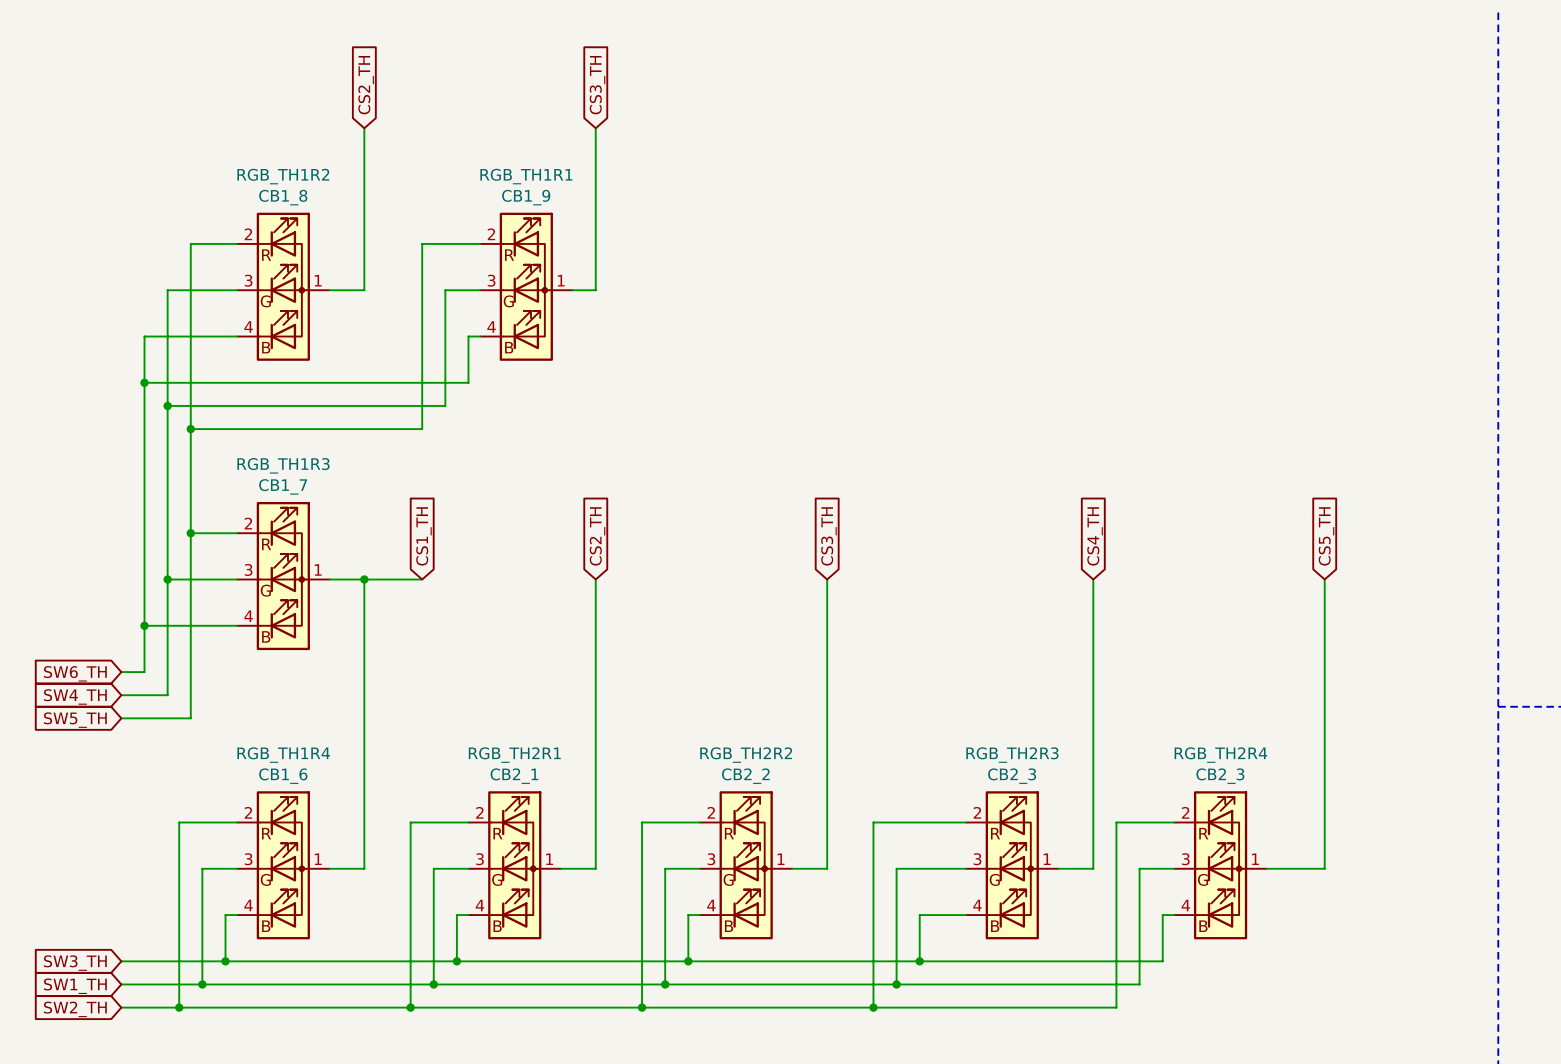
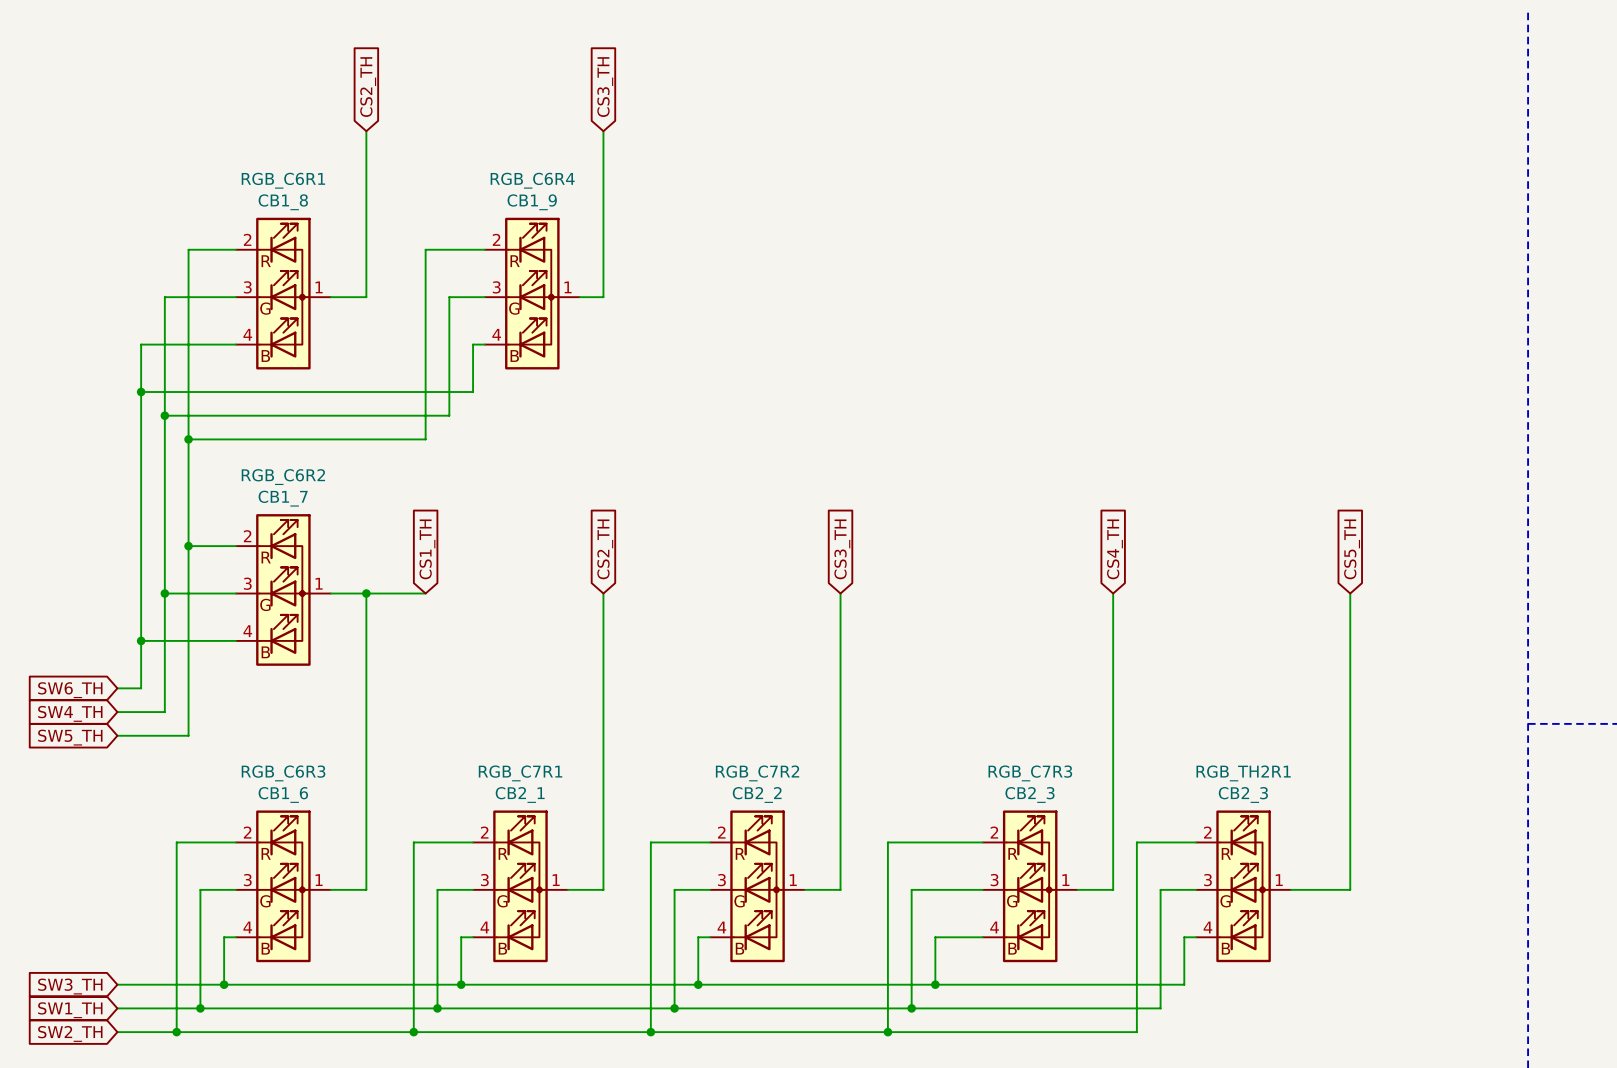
RGB_TH1R2 name: RGB_TH1R2 (283, 176) -> RGB_C6R1 (283, 180)
RGB_TH1R1 name: RGB_TH1R1 (526, 176) -> RGB_C6R4 (532, 180)
RGB_TH1R3 name: RGB_TH1R3 (283, 465) -> RGB_C6R2 (283, 477)
RGB_TH1R4 name: RGB_TH1R4 (283, 755) -> RGB_C6R3 (283, 773)
RGB_TH2R1 name: RGB_TH2R1 (514, 755) -> RGB_C7R1 (520, 773)
RGB_TH2R2 name: RGB_TH2R2 (746, 755) -> RGB_C7R2 (757, 773)
RGB_TH2R3 name: RGB_TH2R3 (1012, 755) -> RGB_C7R3 (1030, 773)
RGB_TH2R4 name: RGB_TH2R4 (1220, 755) -> RGB_TH2R1 (1243, 773)

